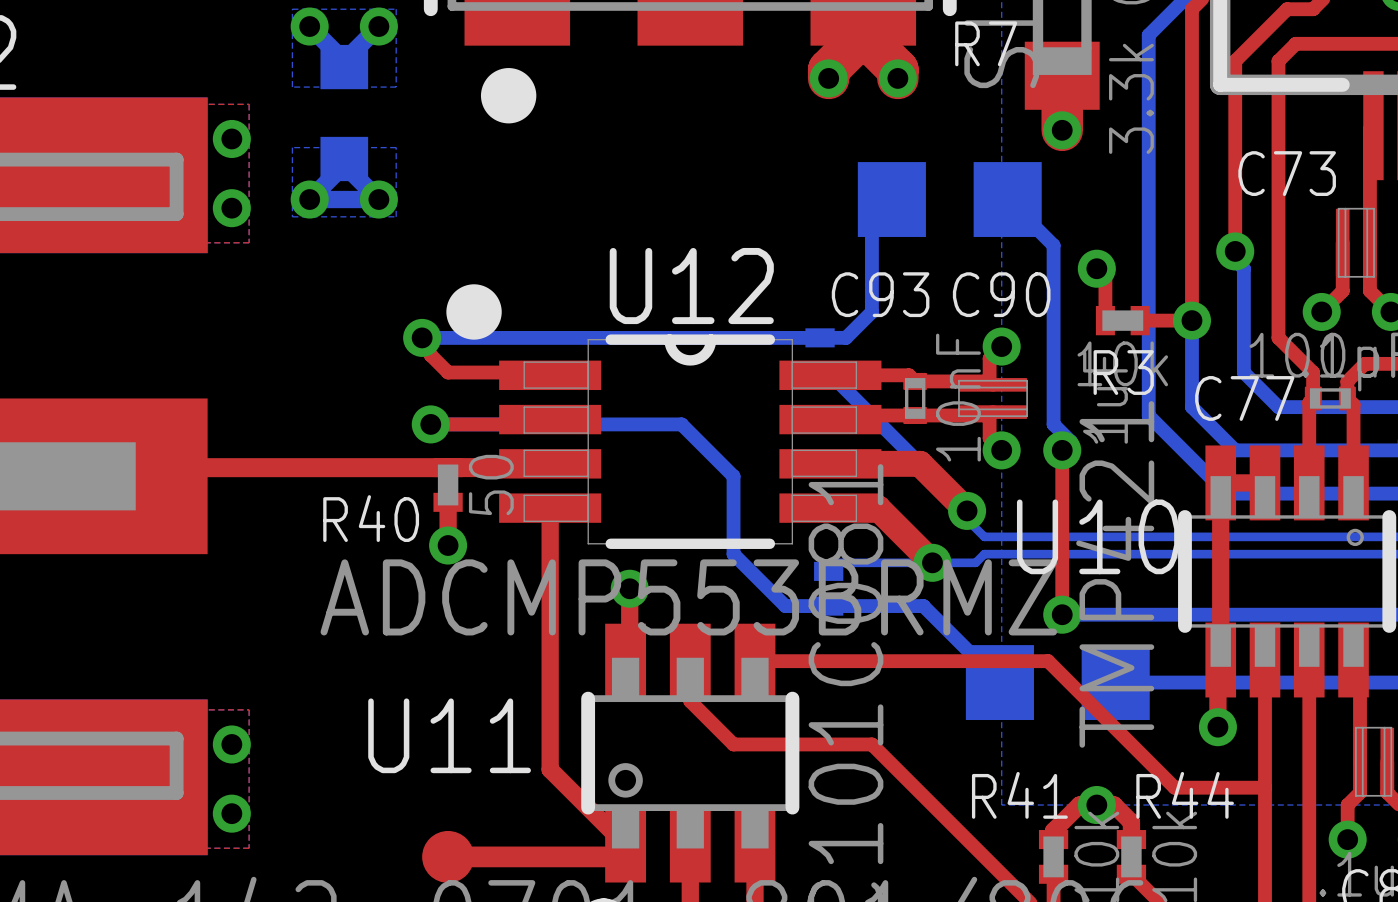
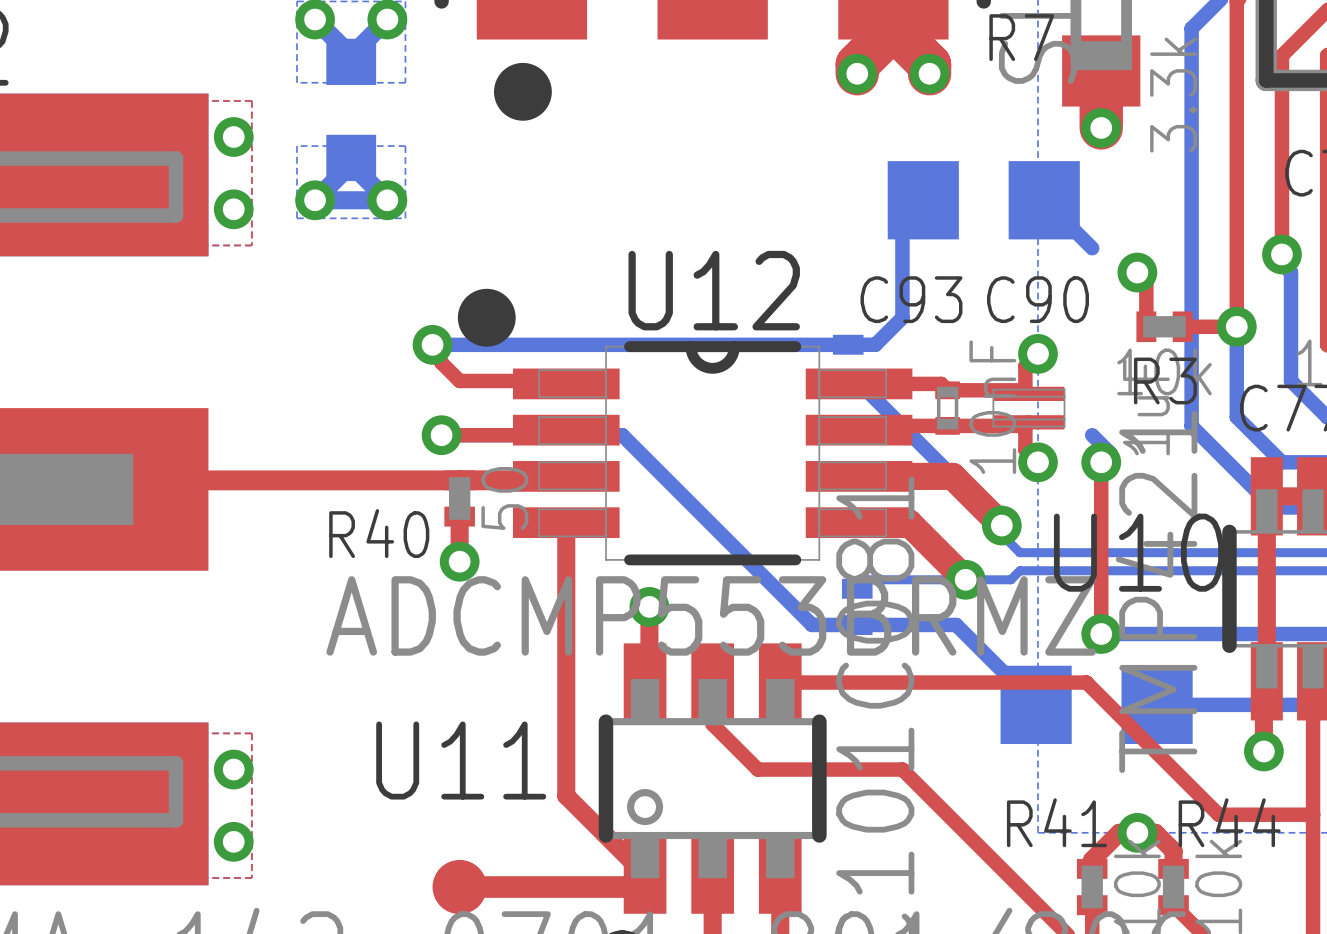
bottom track: (1053, 245) (1053, 424) -> none
bottom track: (603, 424) (681, 424) (733, 476) (733, 554) -> (622, 435) (757, 570)

